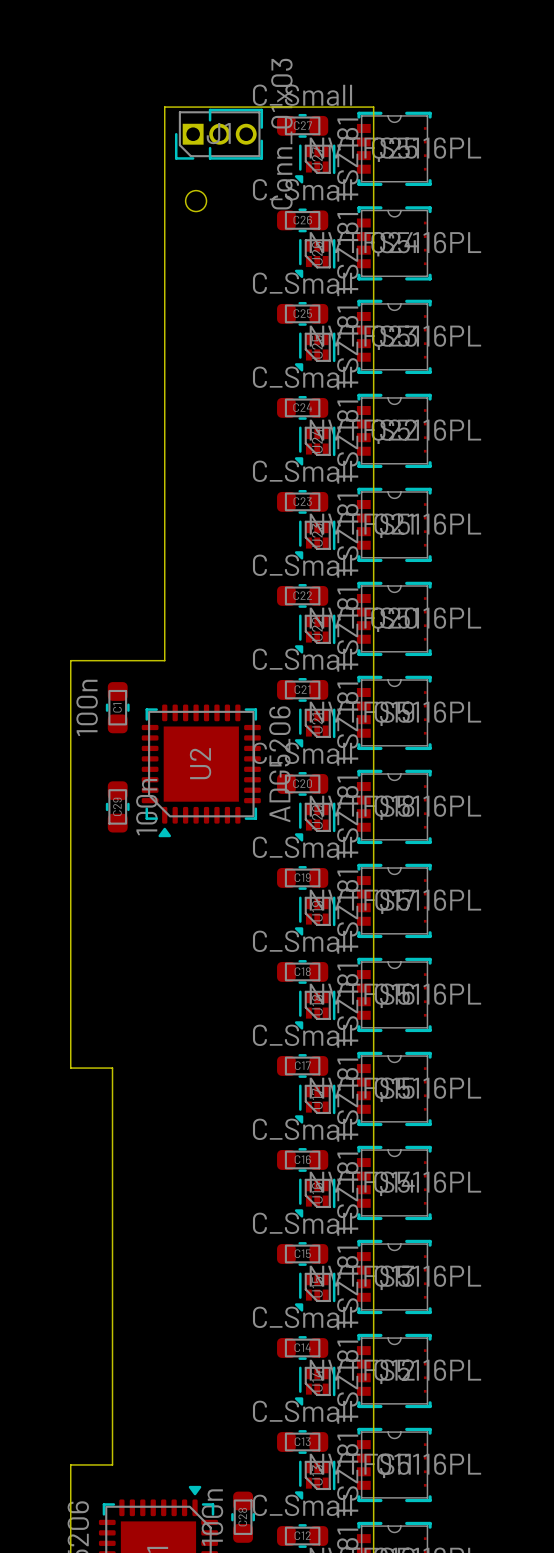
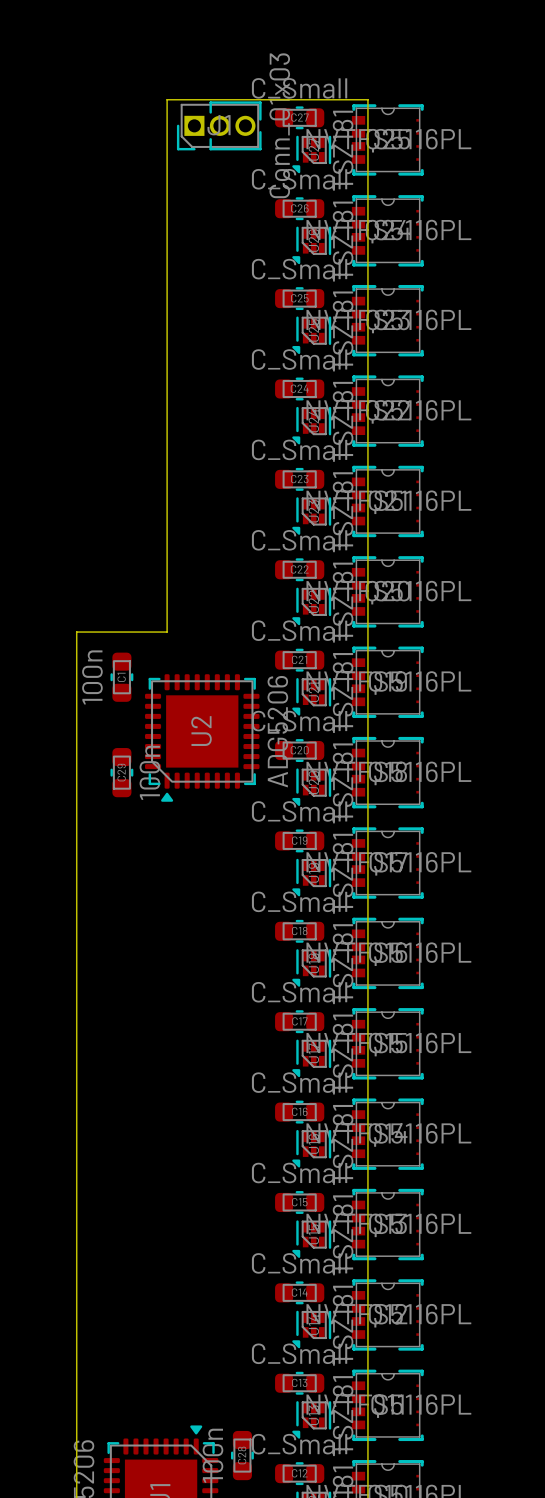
round board edge: [185, 190, 208, 213] -> none
board edge: (70, 1068) (112, 1068) (112, 1464) (70, 1464) -> (76, 1023) (76, 1405)

